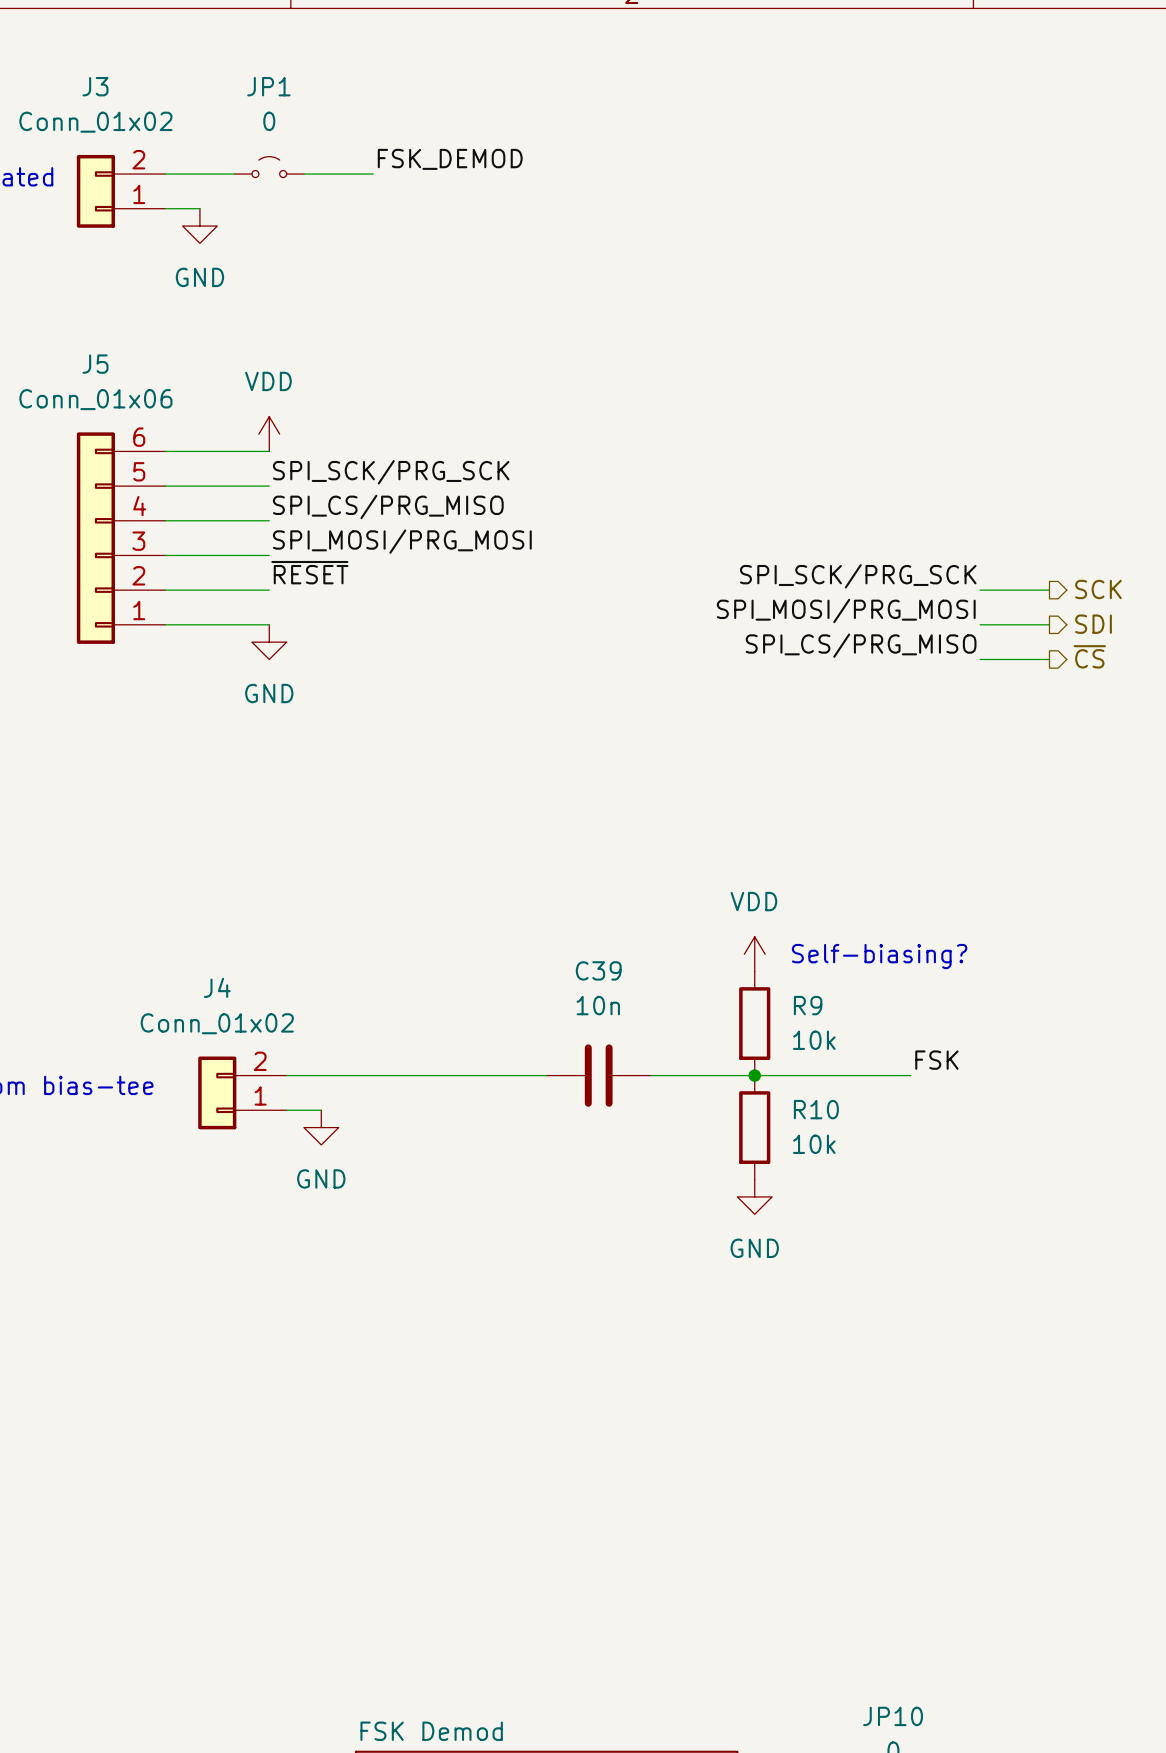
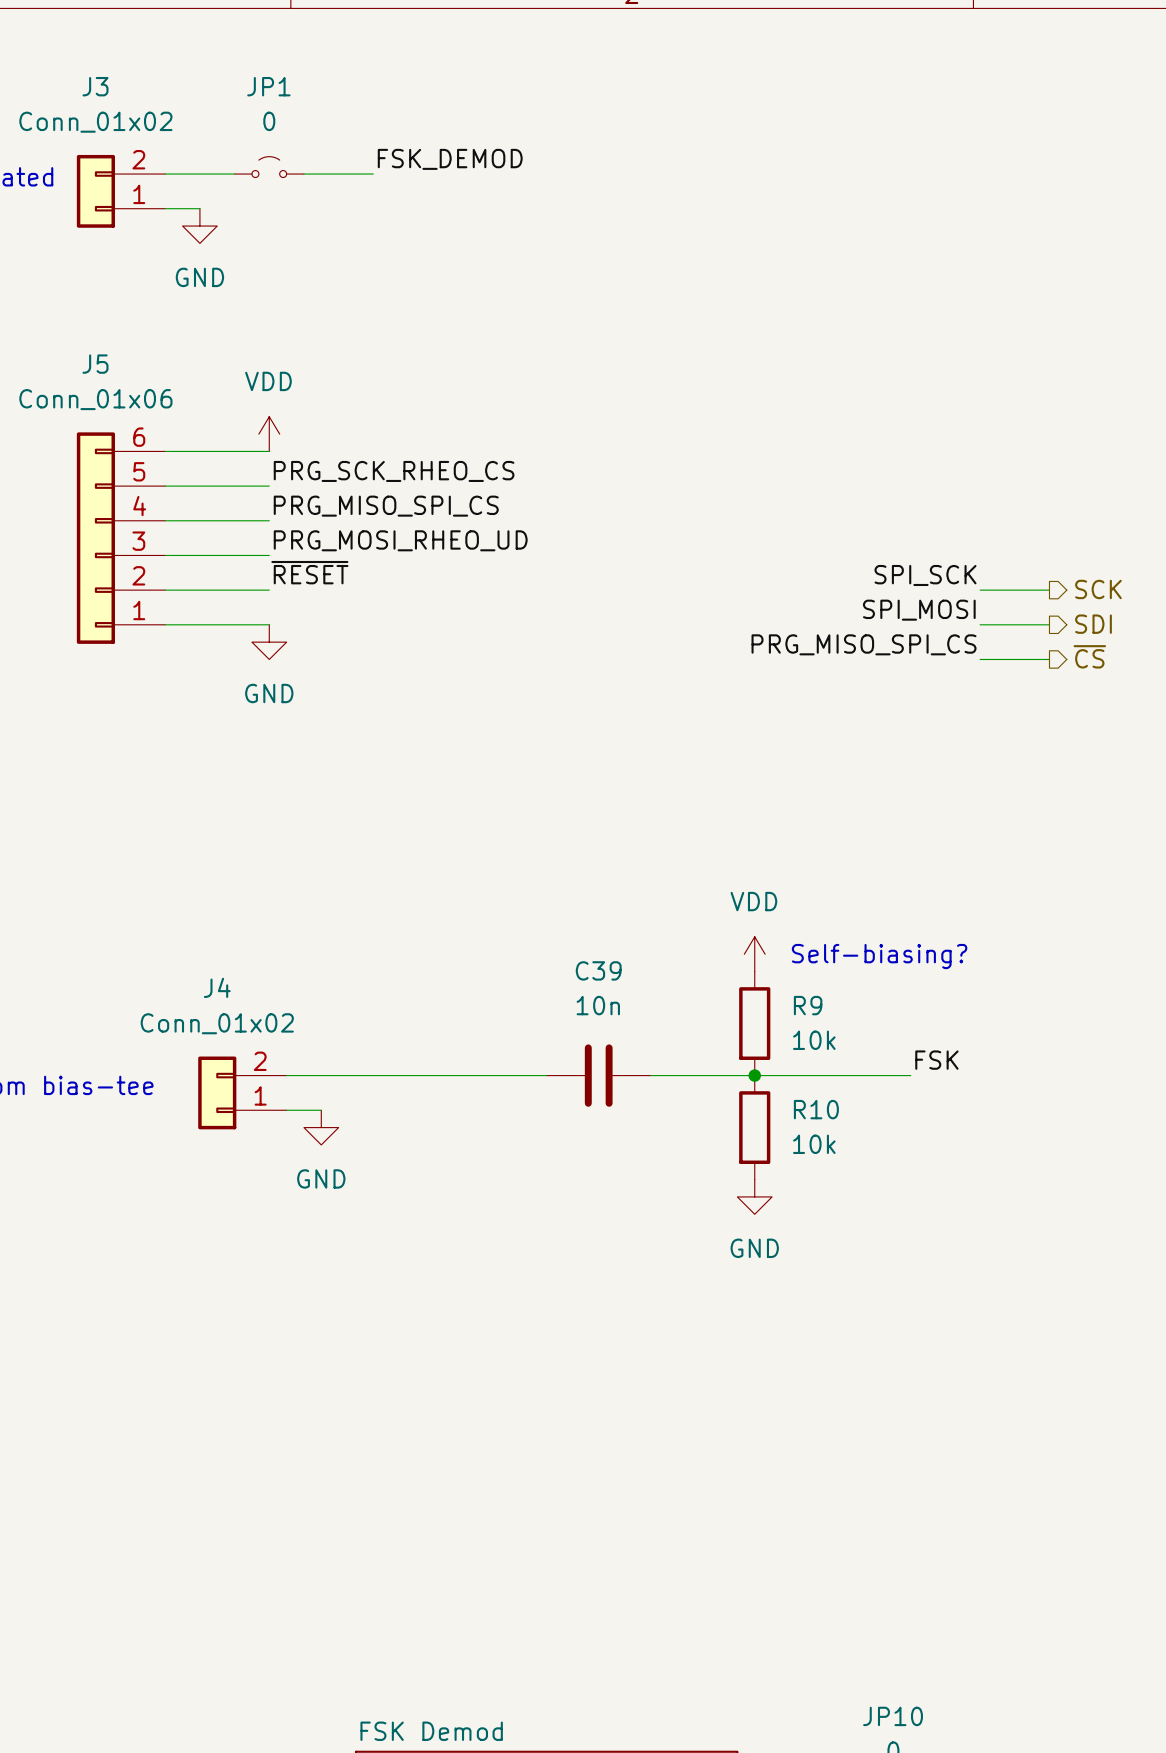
label: SPI_SCK/PRG_SCK (391, 472) -> PRG_SCK_RHEO_CS (394, 471)
label: SPI_CS/PRG_MISO (388, 506) -> PRG_MISO_SPI_CS (386, 506)
label: SPI_MOSI/PRG_MOSI (402, 541) -> PRG_MOSI_RHEO_UD (400, 540)
label: SPI_SCK/PRG_SCK (858, 576) -> SPI_SCK (925, 575)
label: SPI_MOSI/PRG_MOSI (846, 610) -> SPI_MOSI (919, 610)
label: SPI_CS/PRG_MISO (861, 645) -> PRG_MISO_SPI_CS (864, 644)

